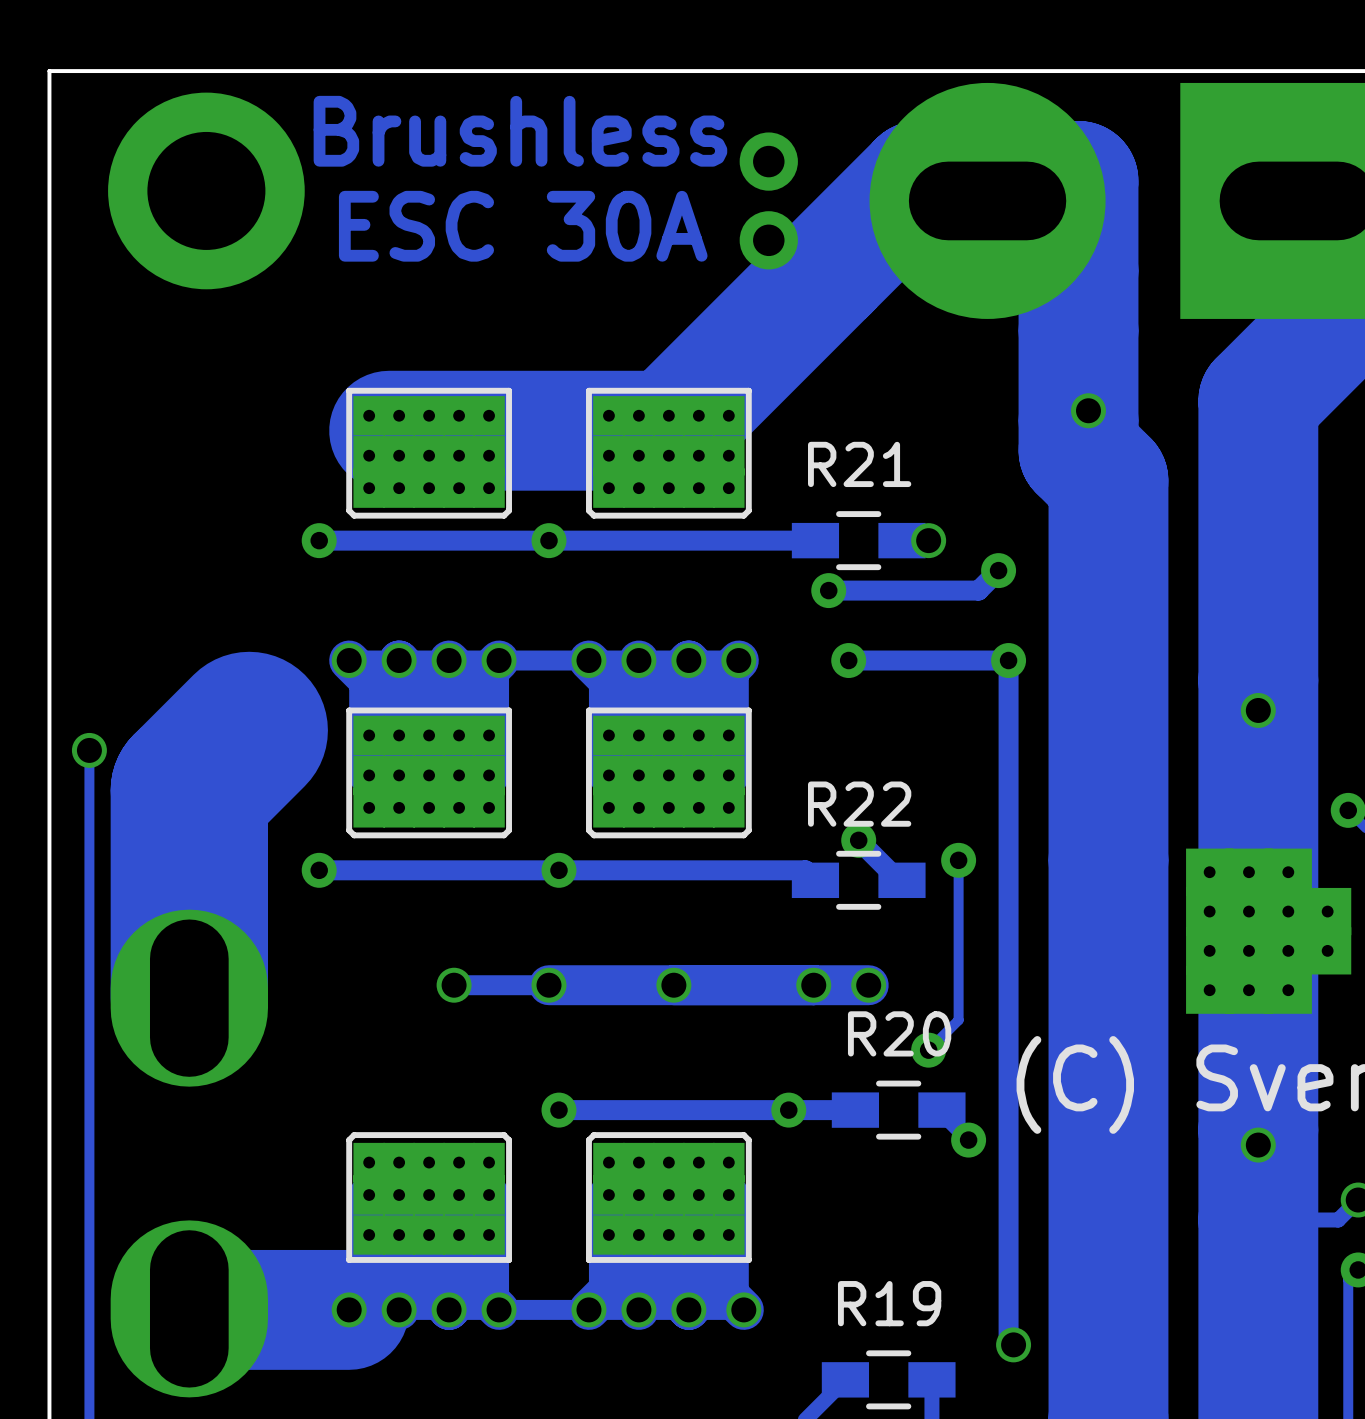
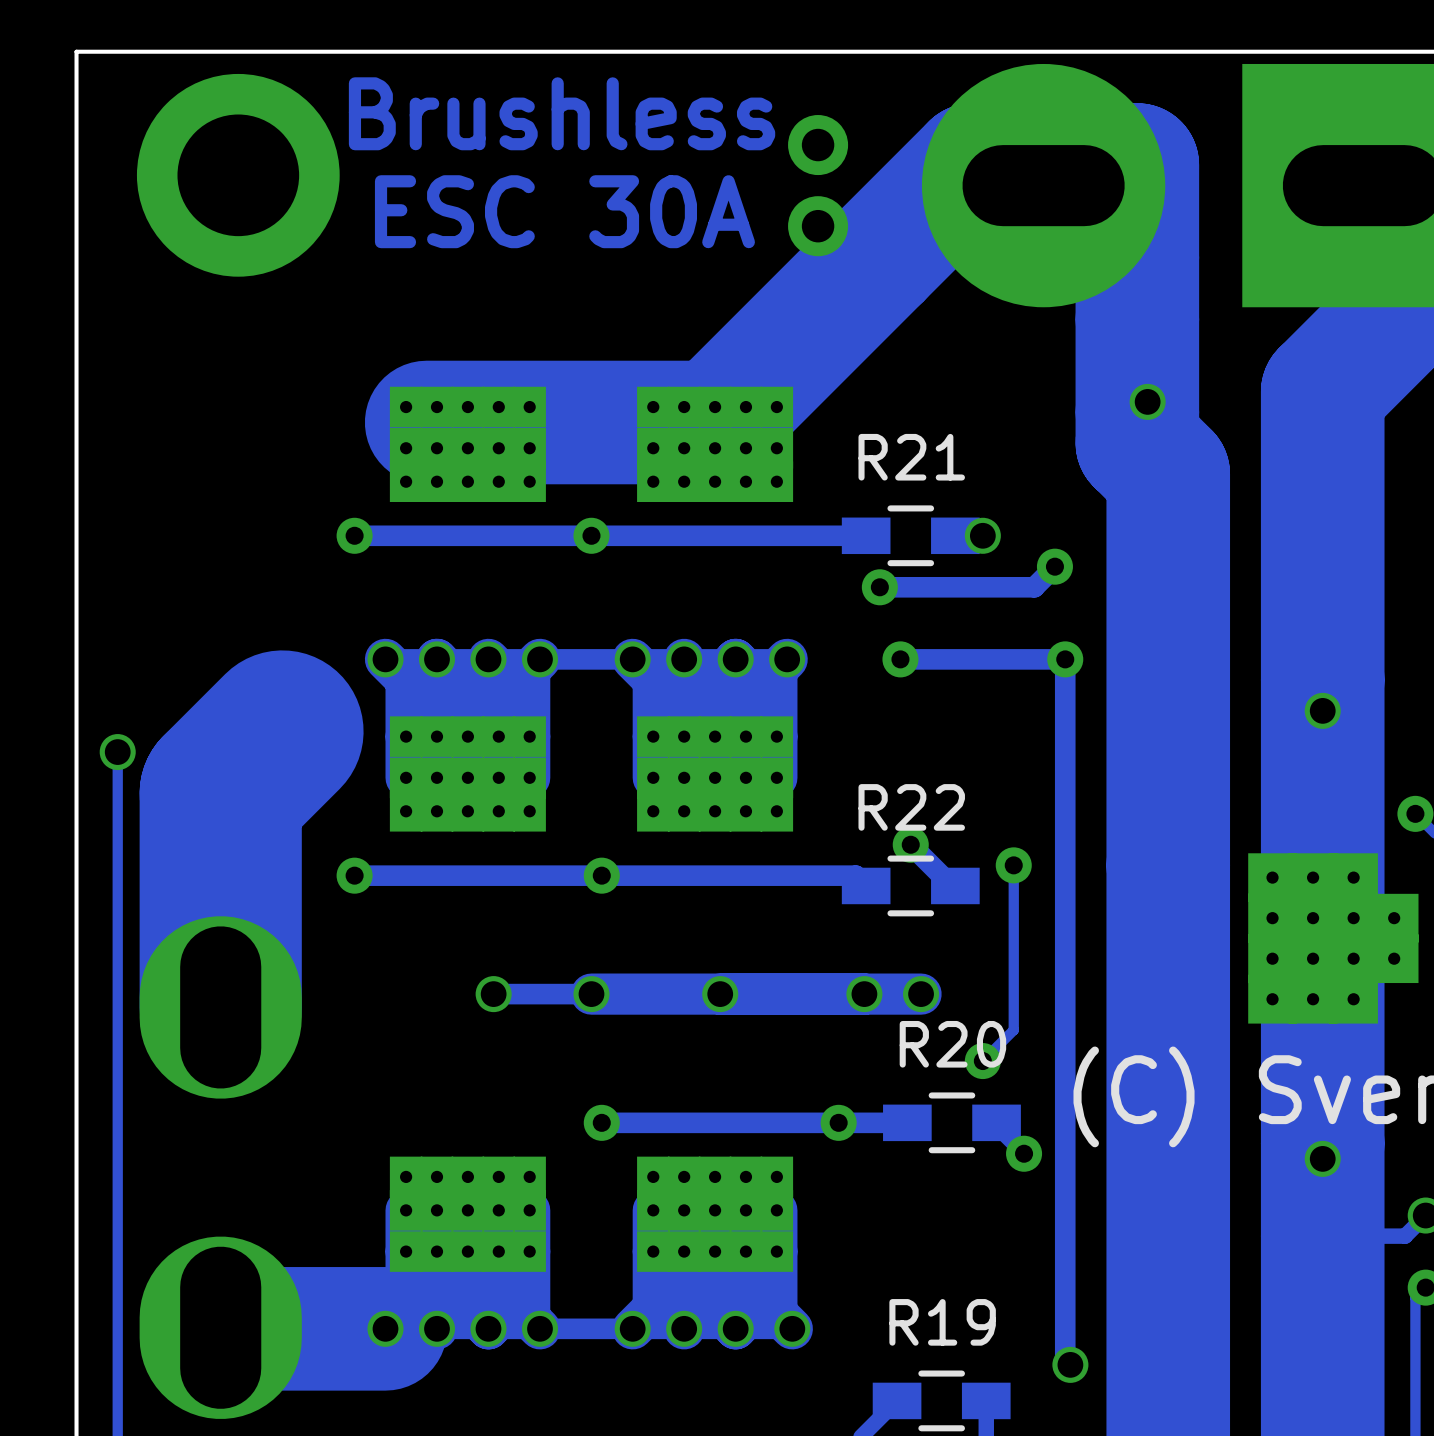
part footprint: [346, 387, 512, 519] -> [389, 386, 546, 502]
part footprint: [586, 387, 752, 519] -> [637, 386, 794, 502]
part footprint: [346, 707, 512, 839] -> [389, 716, 546, 832]
part footprint: [586, 707, 752, 839] -> [637, 716, 794, 832]
part footprint: [346, 1132, 512, 1263] -> [389, 1156, 546, 1272]
part footprint: [586, 1132, 752, 1263] -> [637, 1156, 794, 1272]

